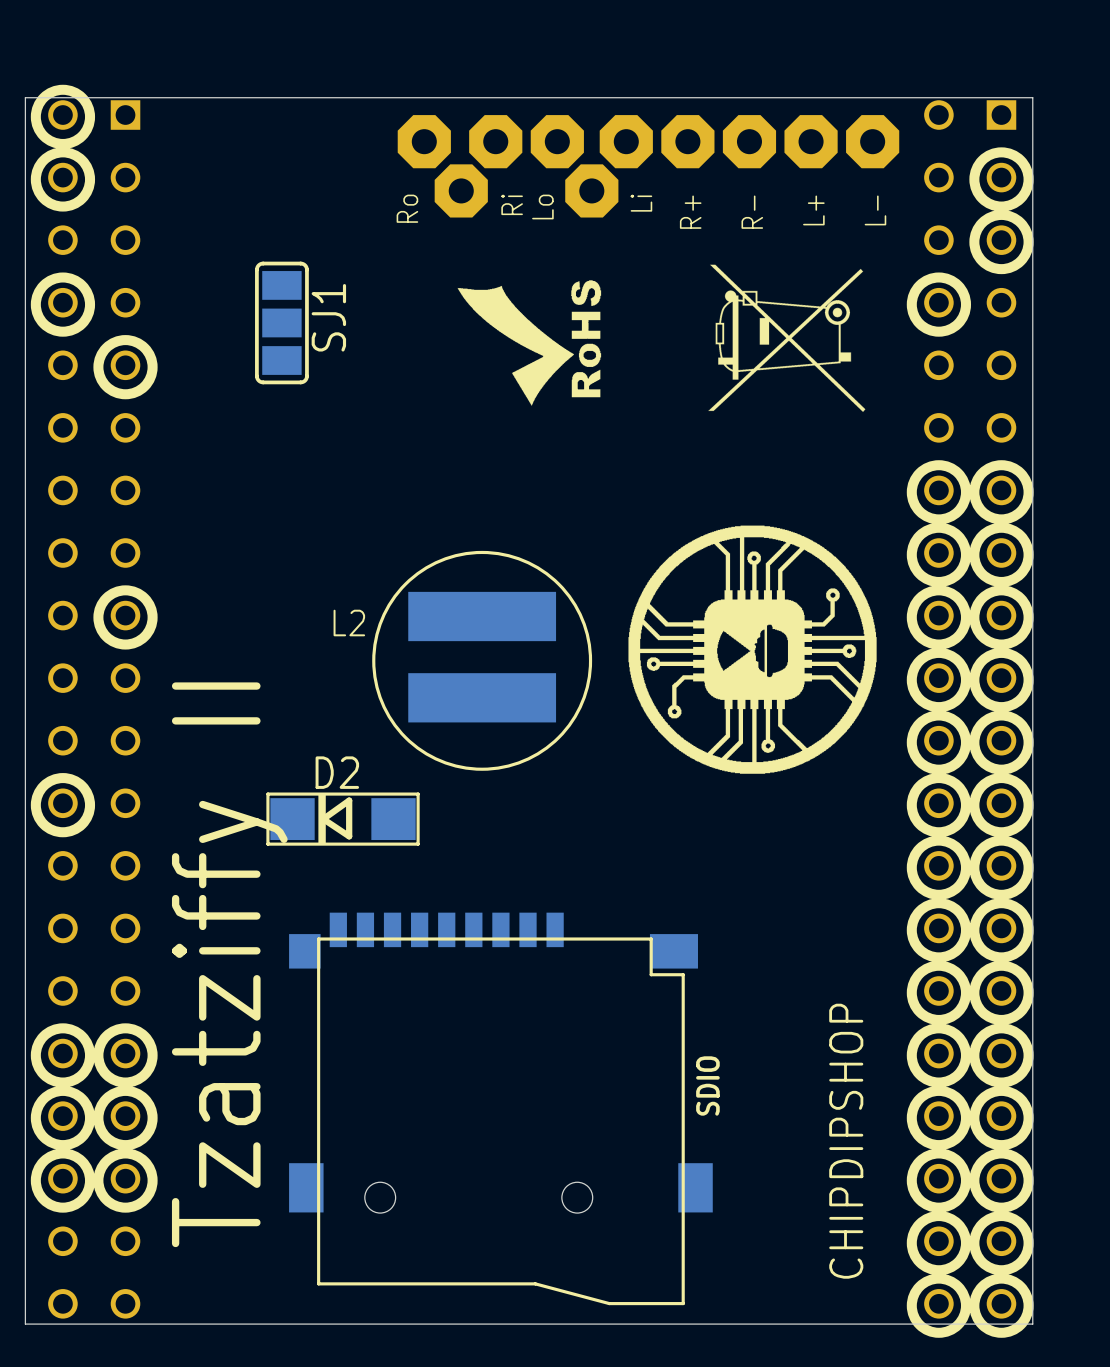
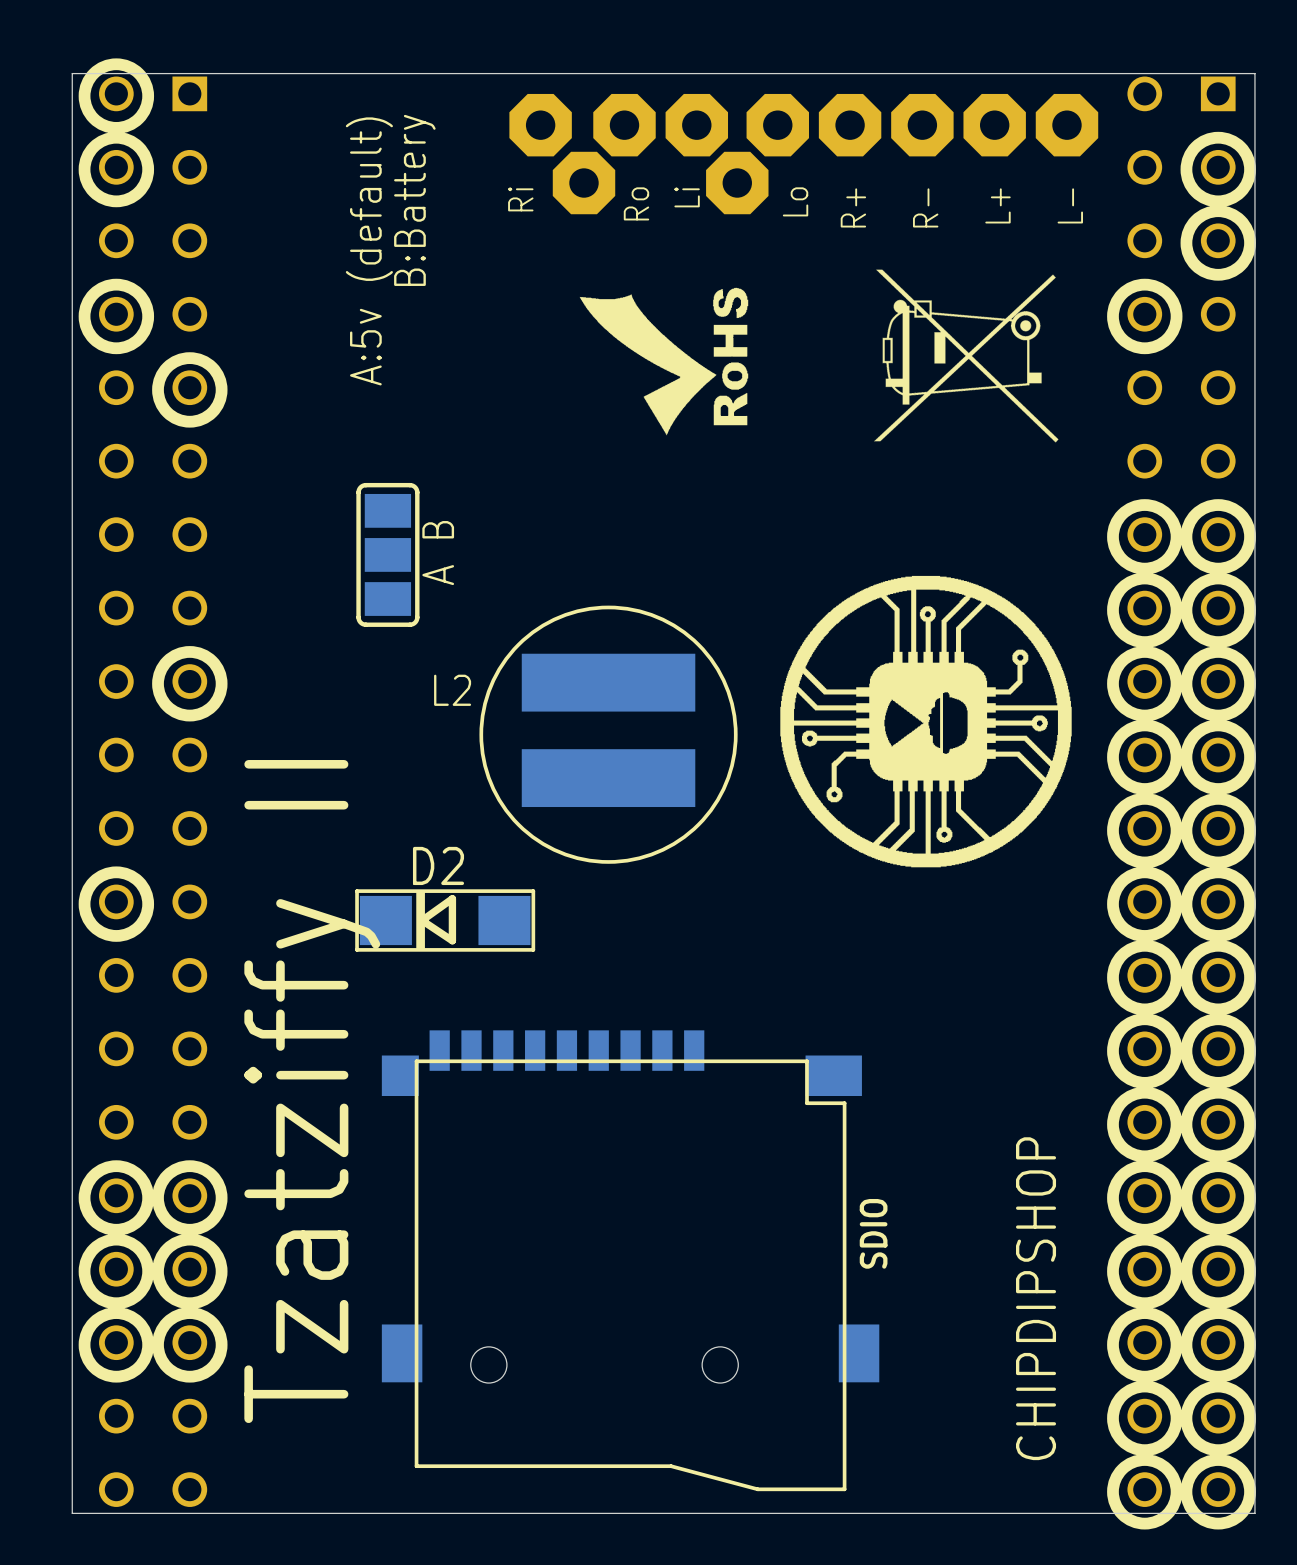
text: Li (641, 203) -> Lo (795, 201)
text: Ri (512, 204) -> Ro (636, 203)
text: none -> B:Battery (414, 200)
text: Lo (542, 207) -> Li (687, 197)
text: Ro (407, 208) -> Ri (520, 199)
text: none -> A:5v (default) (369, 251)
SJ1: (281, 322) -> none
text: none -> A B (438, 553)
part: none -> (387, 554)

